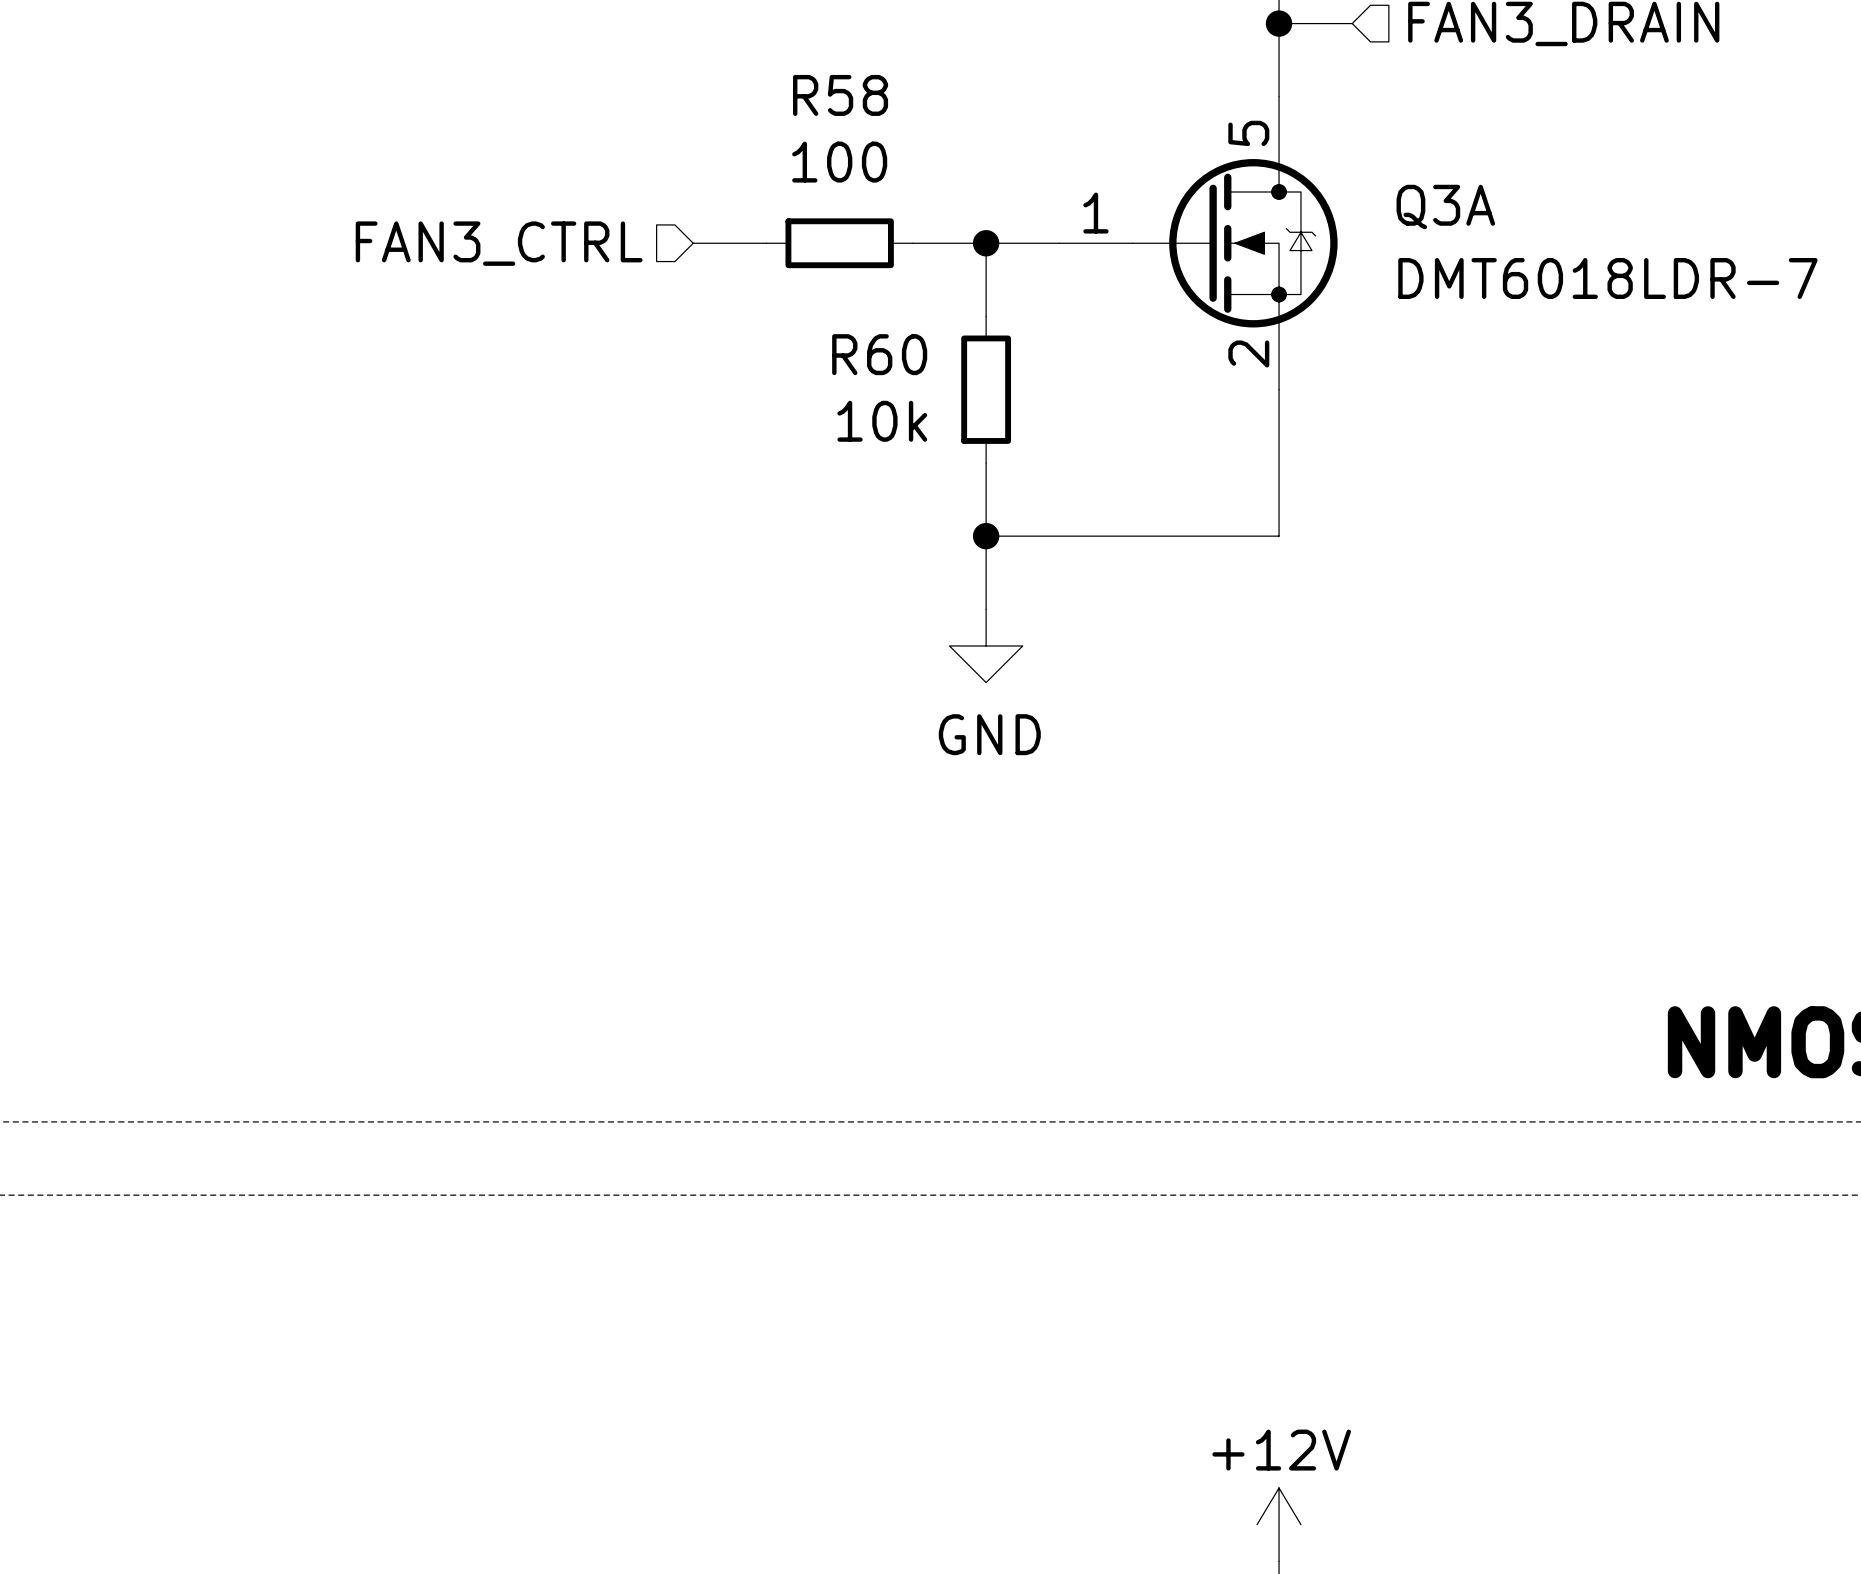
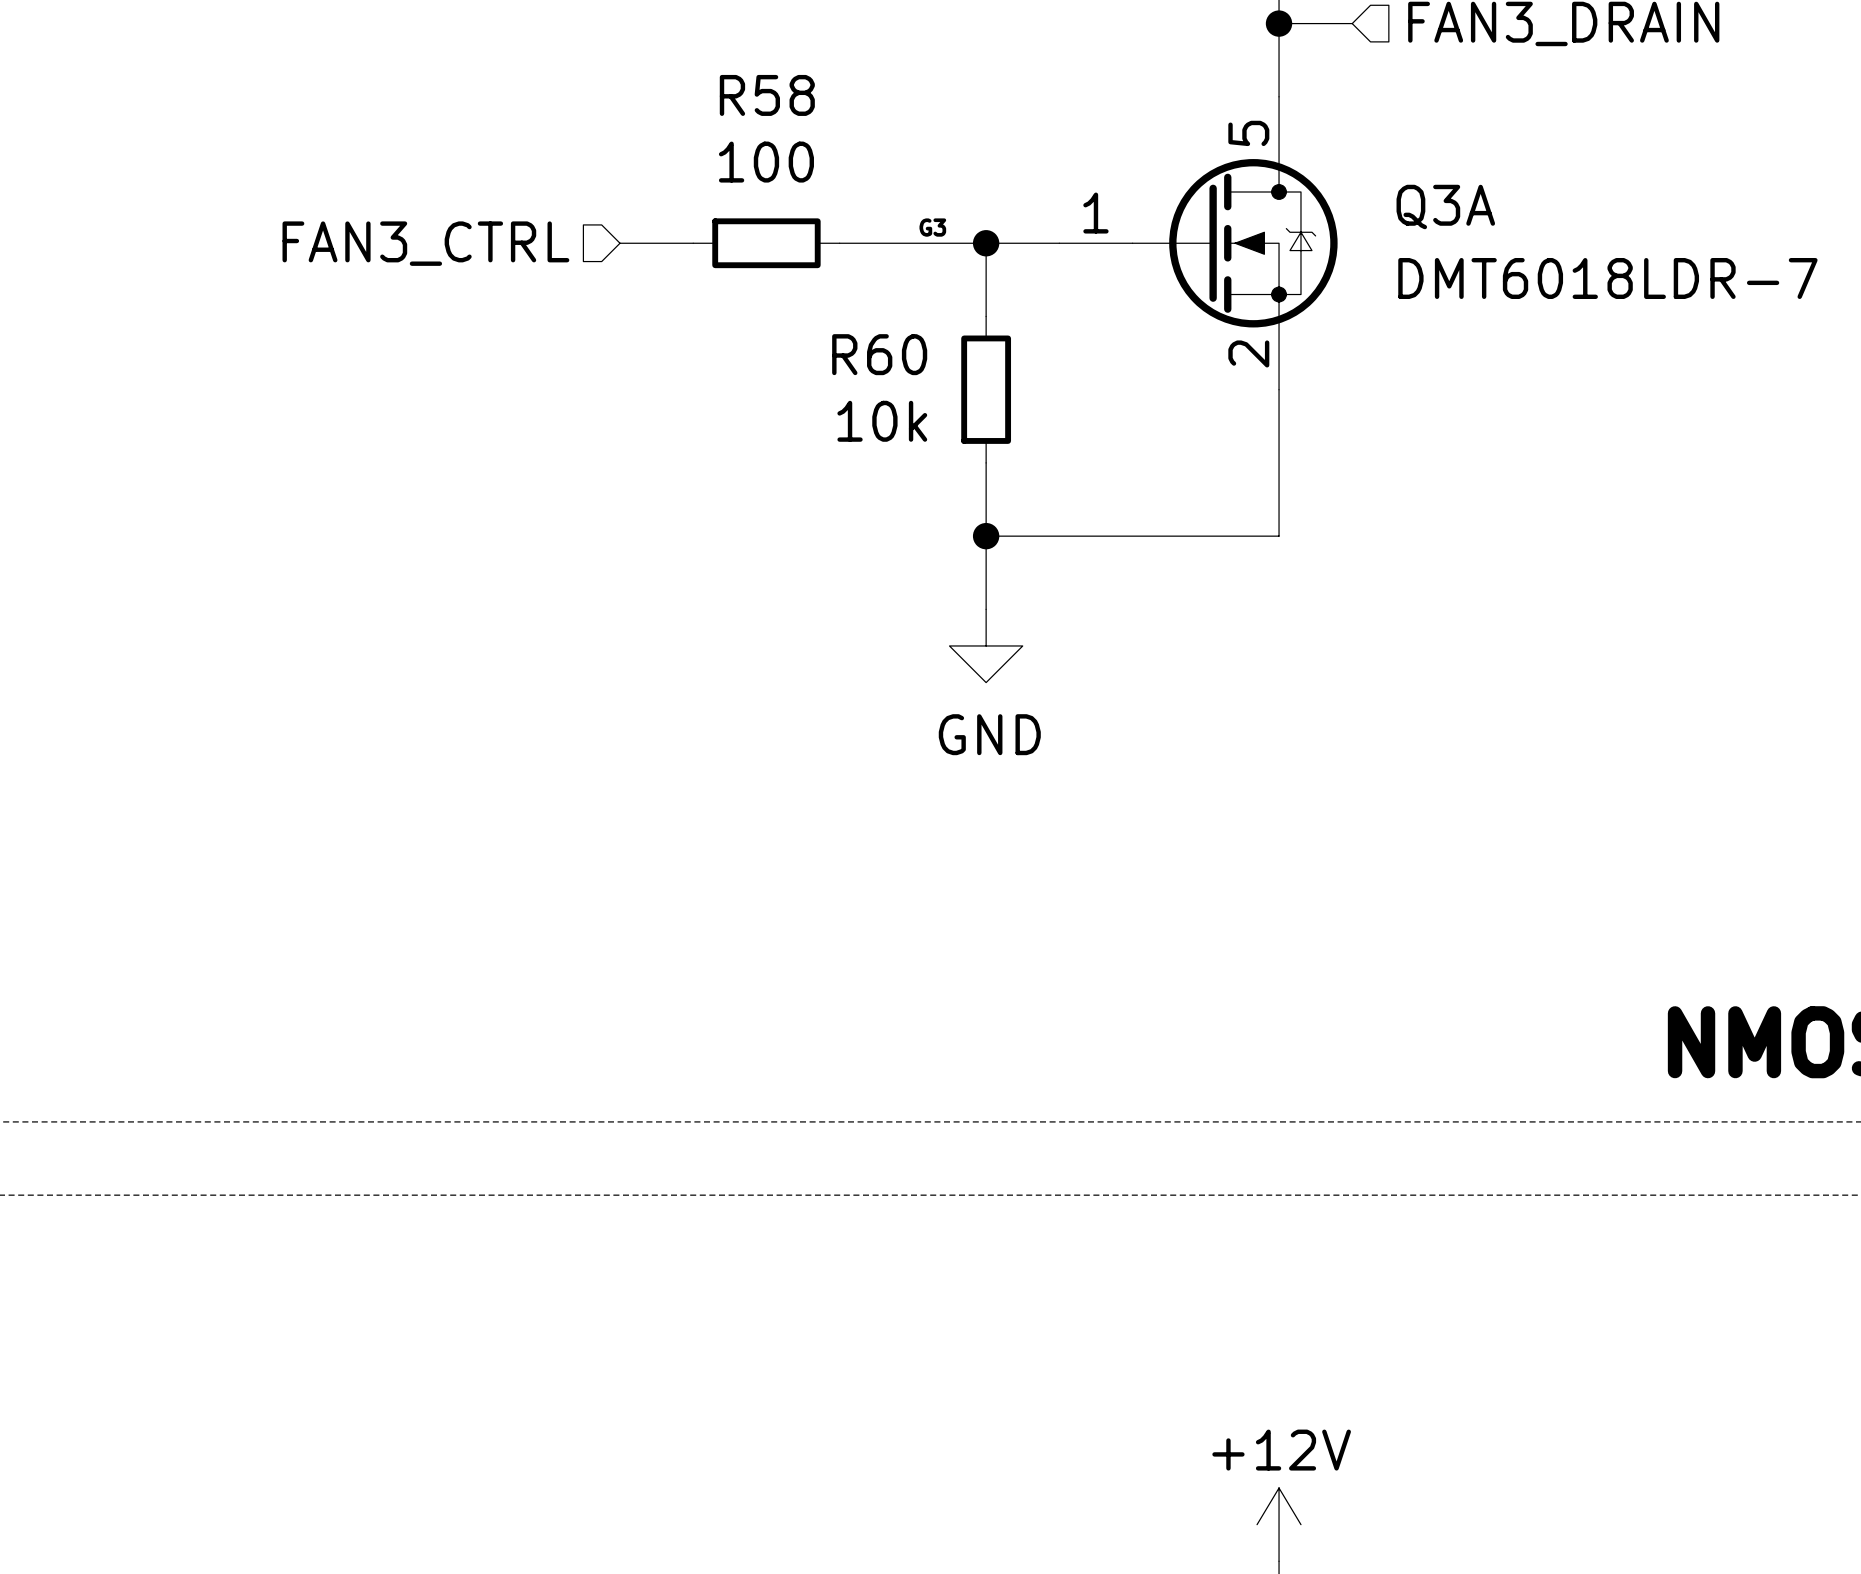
label: none -> G3 (932, 227)
hierarchical label position: FAN3_CTRL (499, 243) -> FAN3_CTRL (425, 243)
wire: (693, 243) (766, 243) -> (693, 243) (620, 243)
wire: none -> (839, 243) (912, 243)
R58 position: (839, 243) -> (766, 243)

